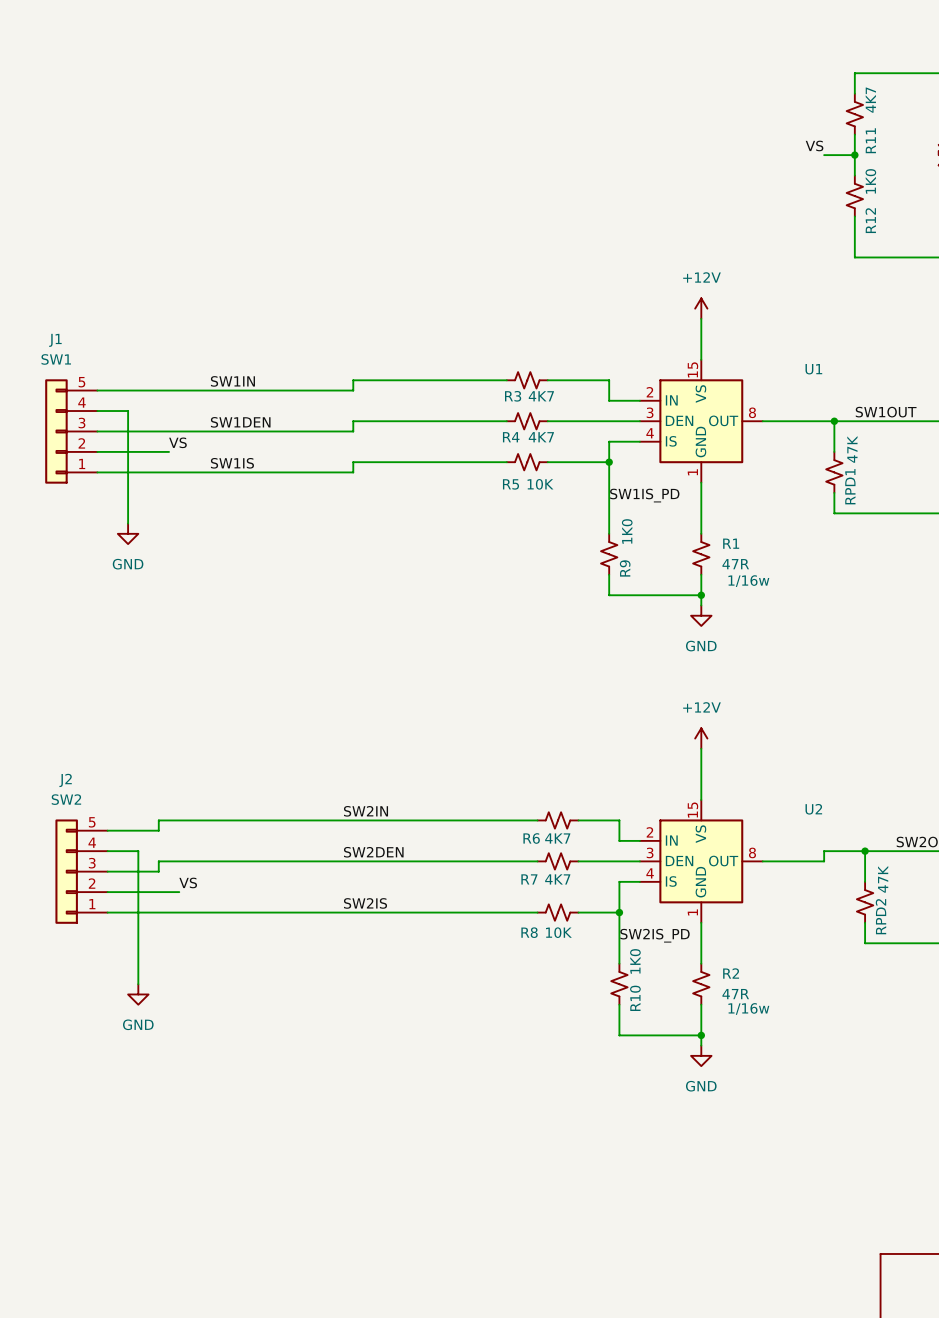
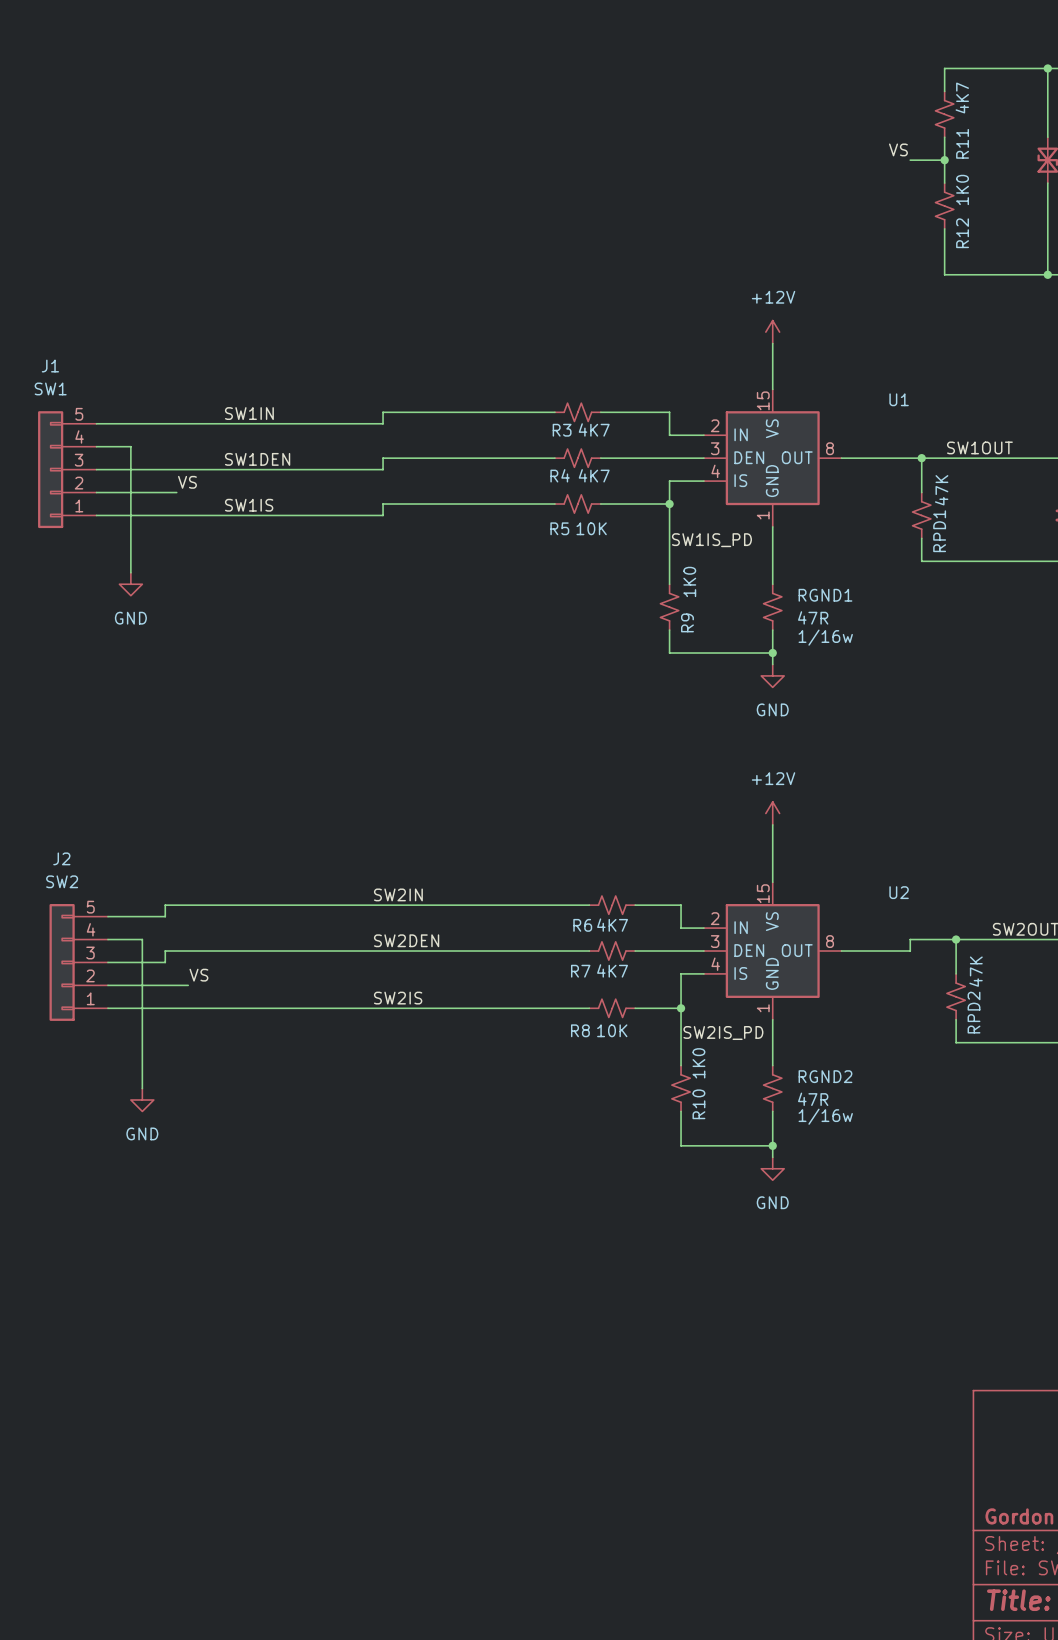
R1 name: R1 (731, 543) -> RGND1 (825, 595)
R2 name: R2 (731, 973) -> RGND2 (825, 1076)

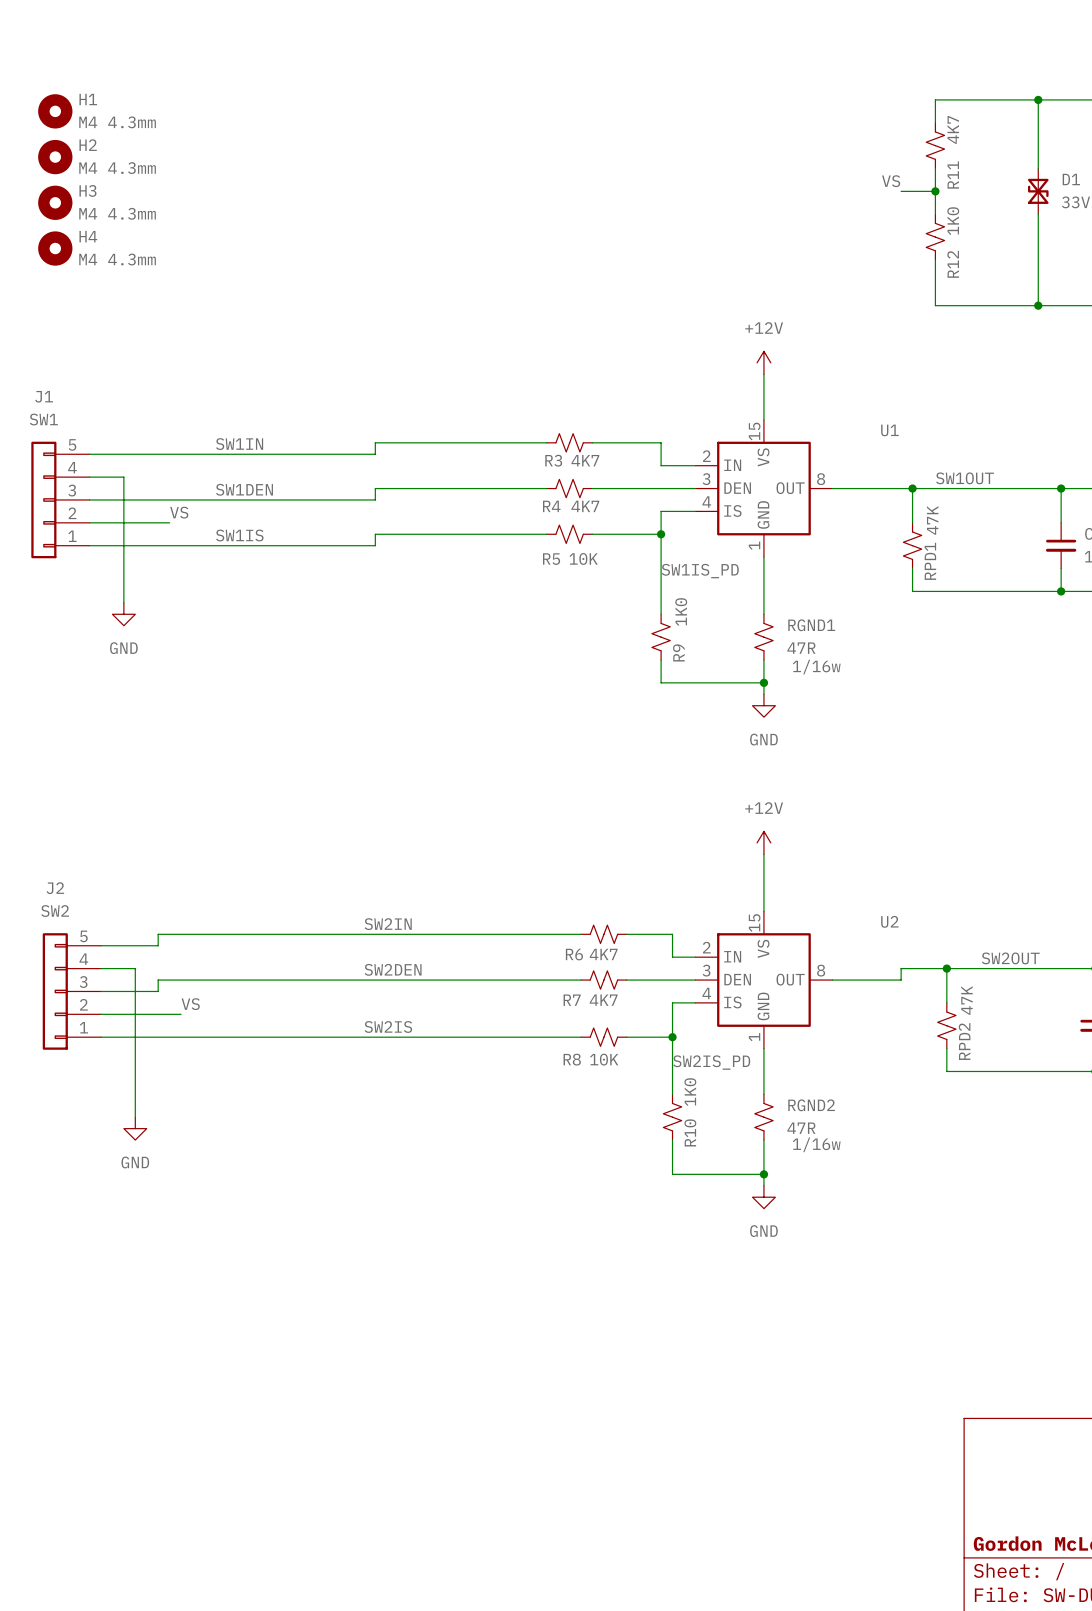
H1: none -> M4 4.3mm (55, 111)
H2: none -> M4 4.3mm (55, 157)
H3: none -> M4 4.3mm (55, 202)
H4: none -> M4 4.3mm (55, 248)

